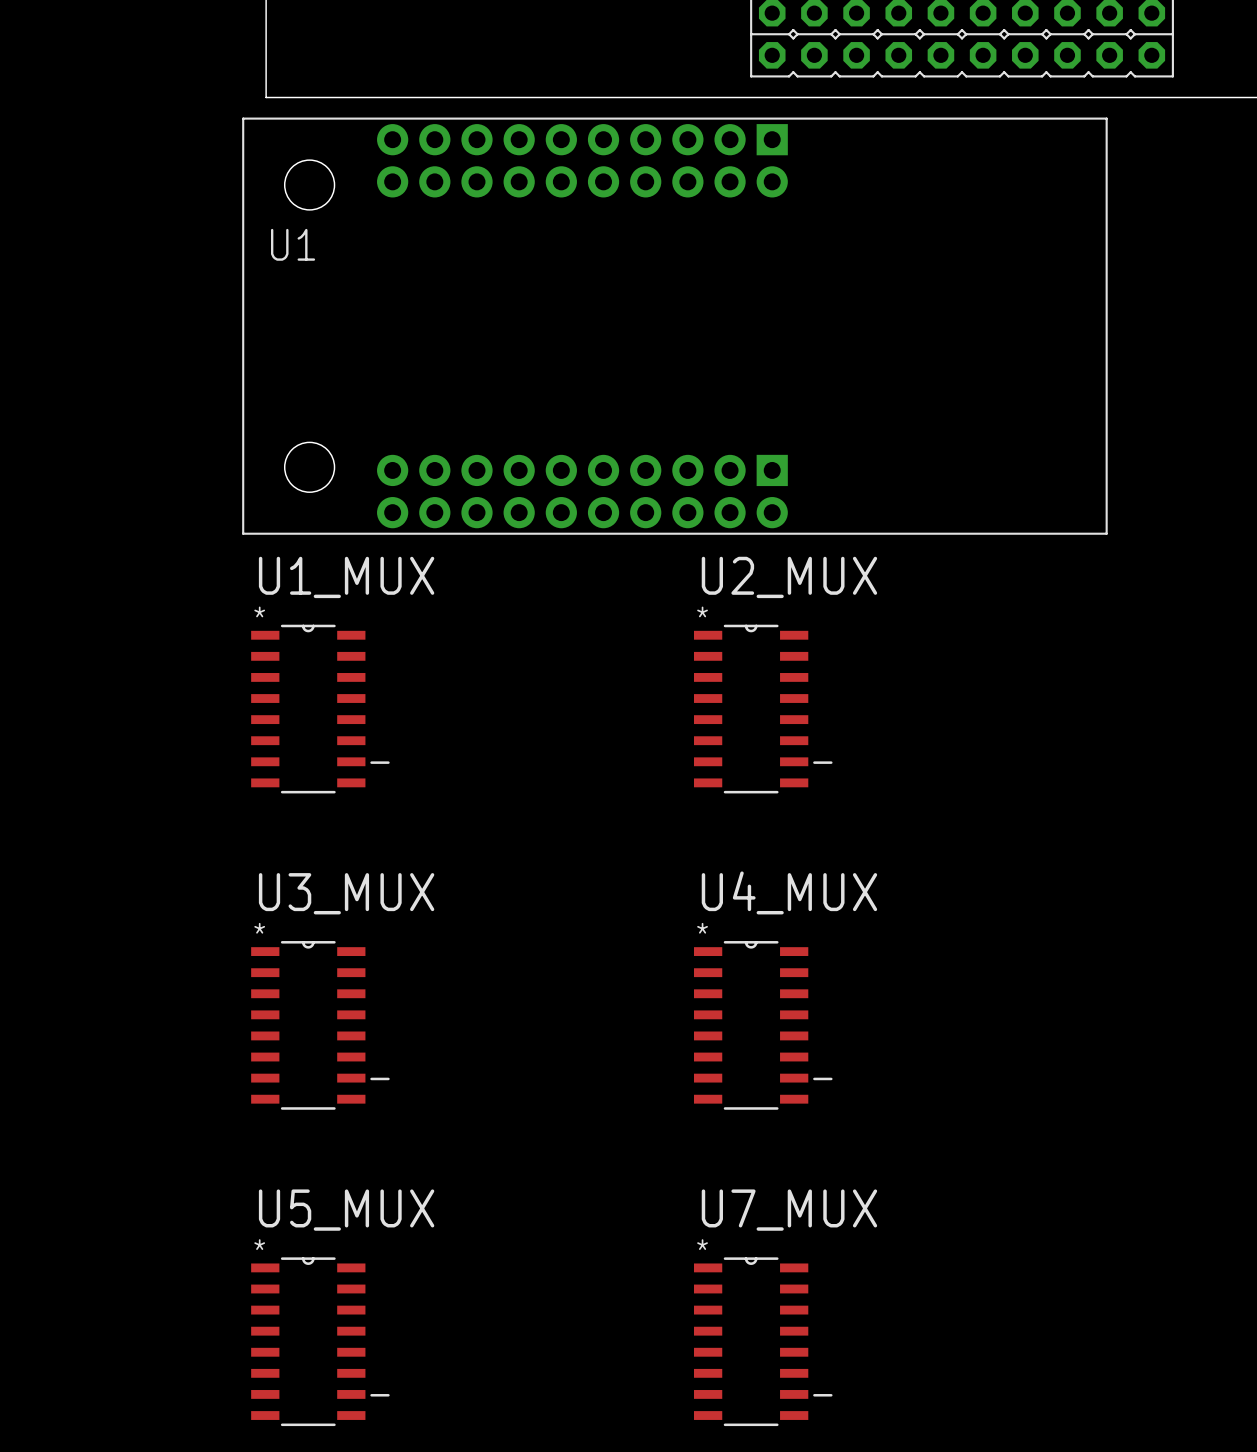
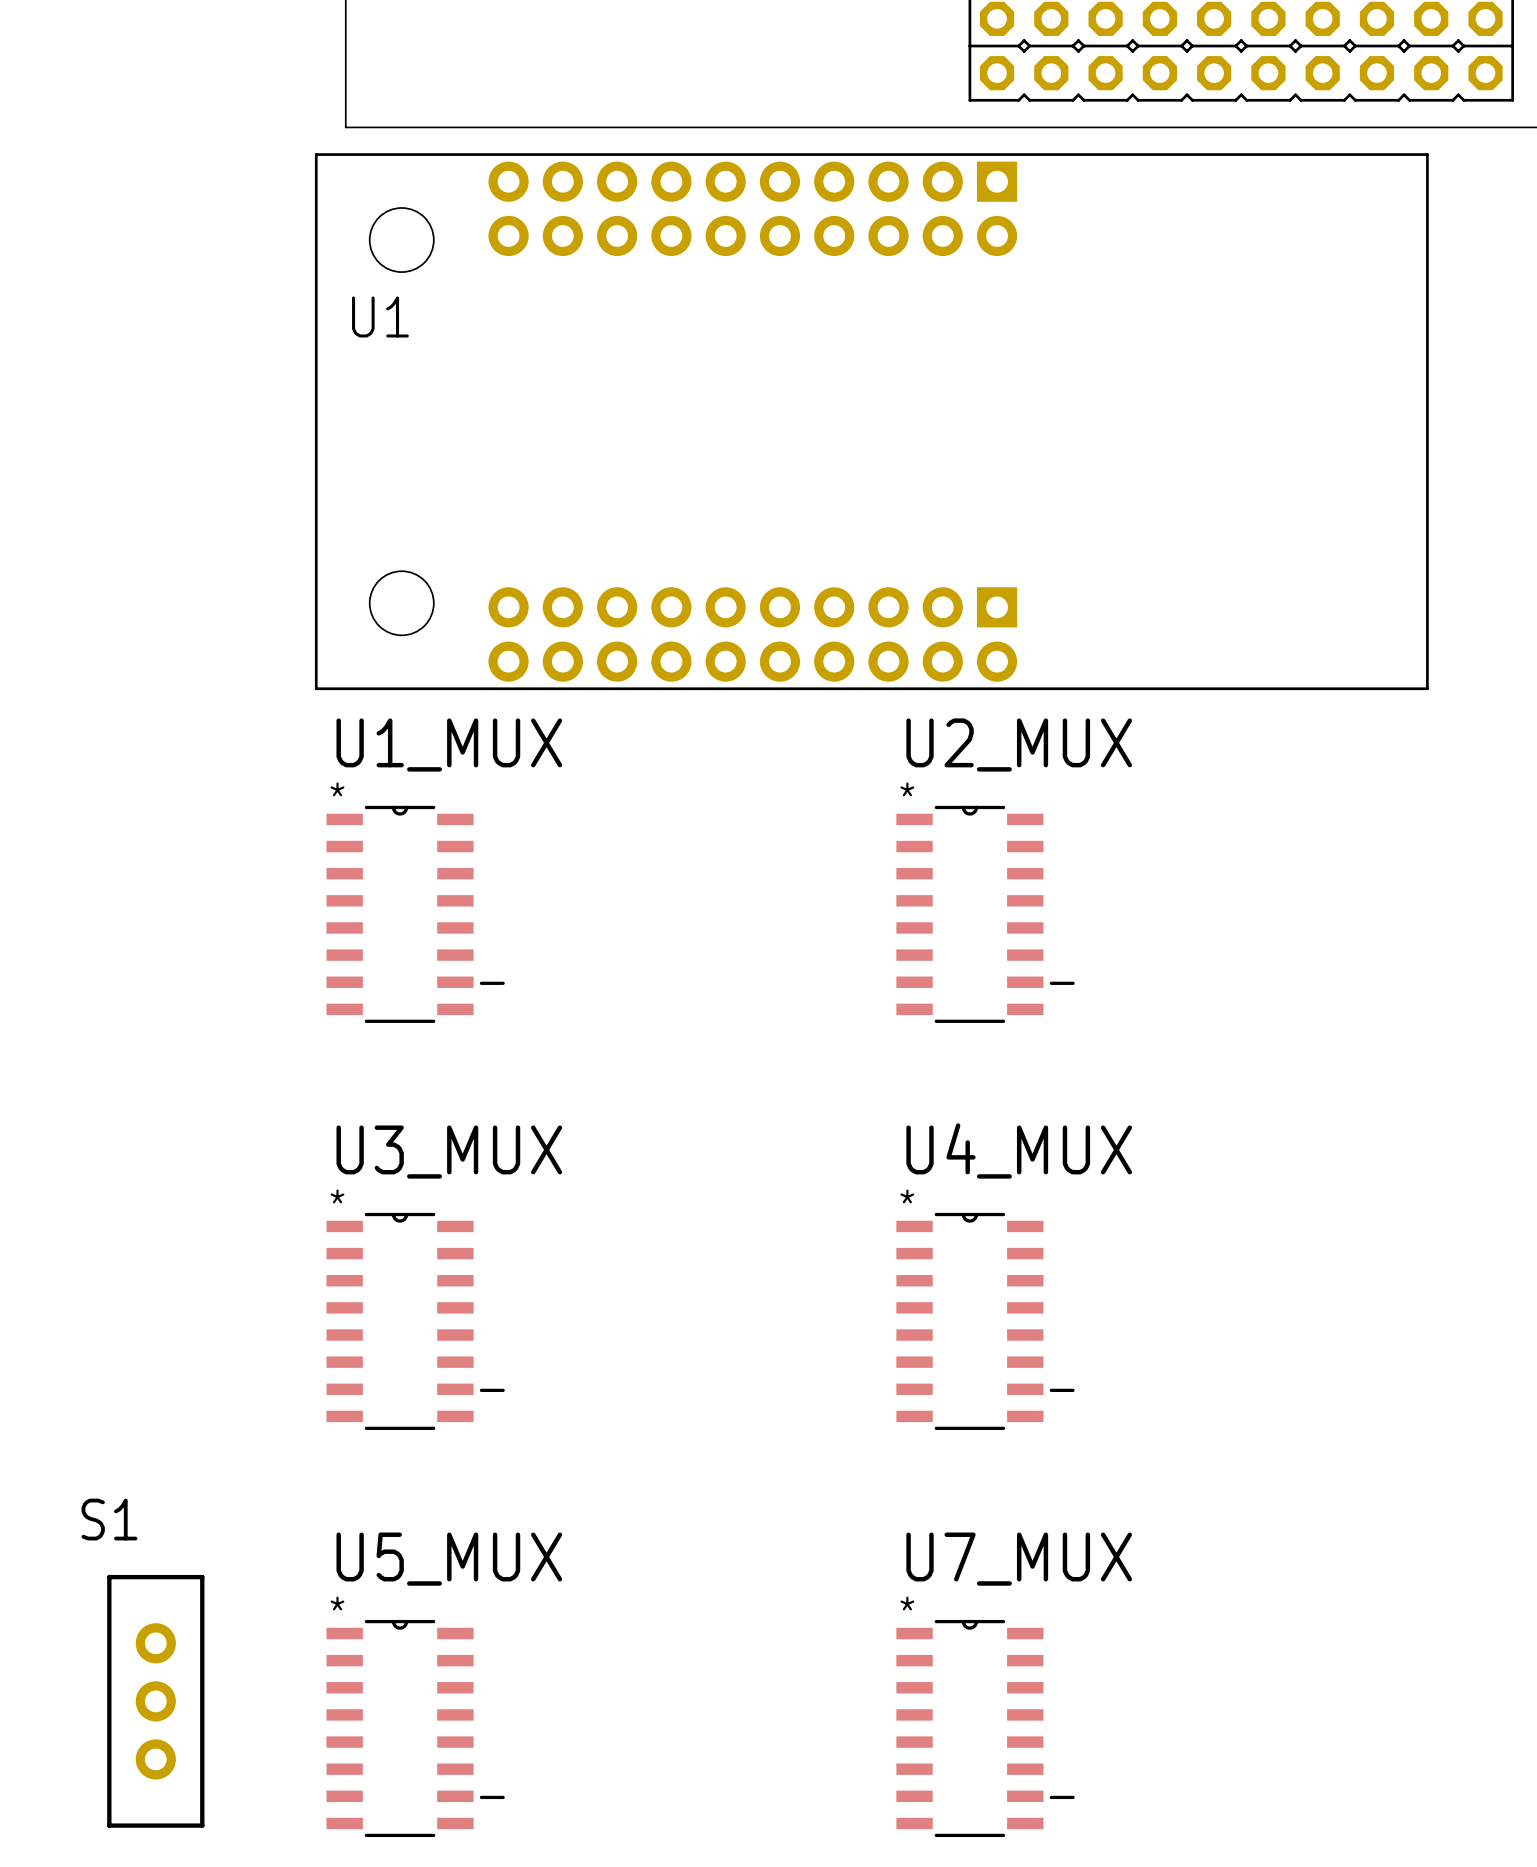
S1: none -> (155, 1701)

